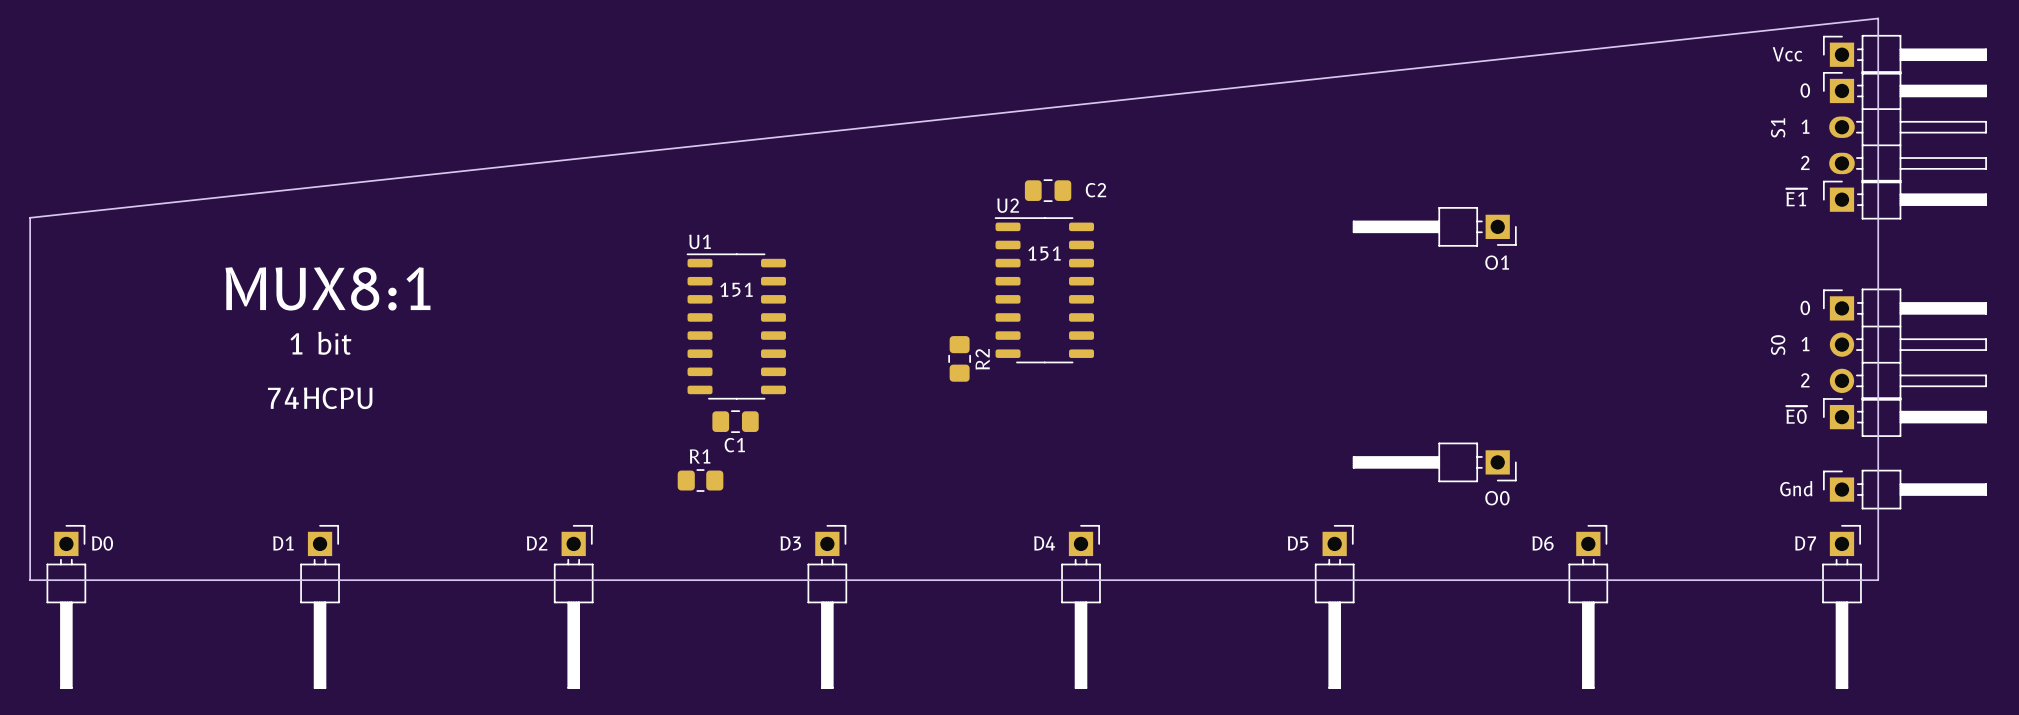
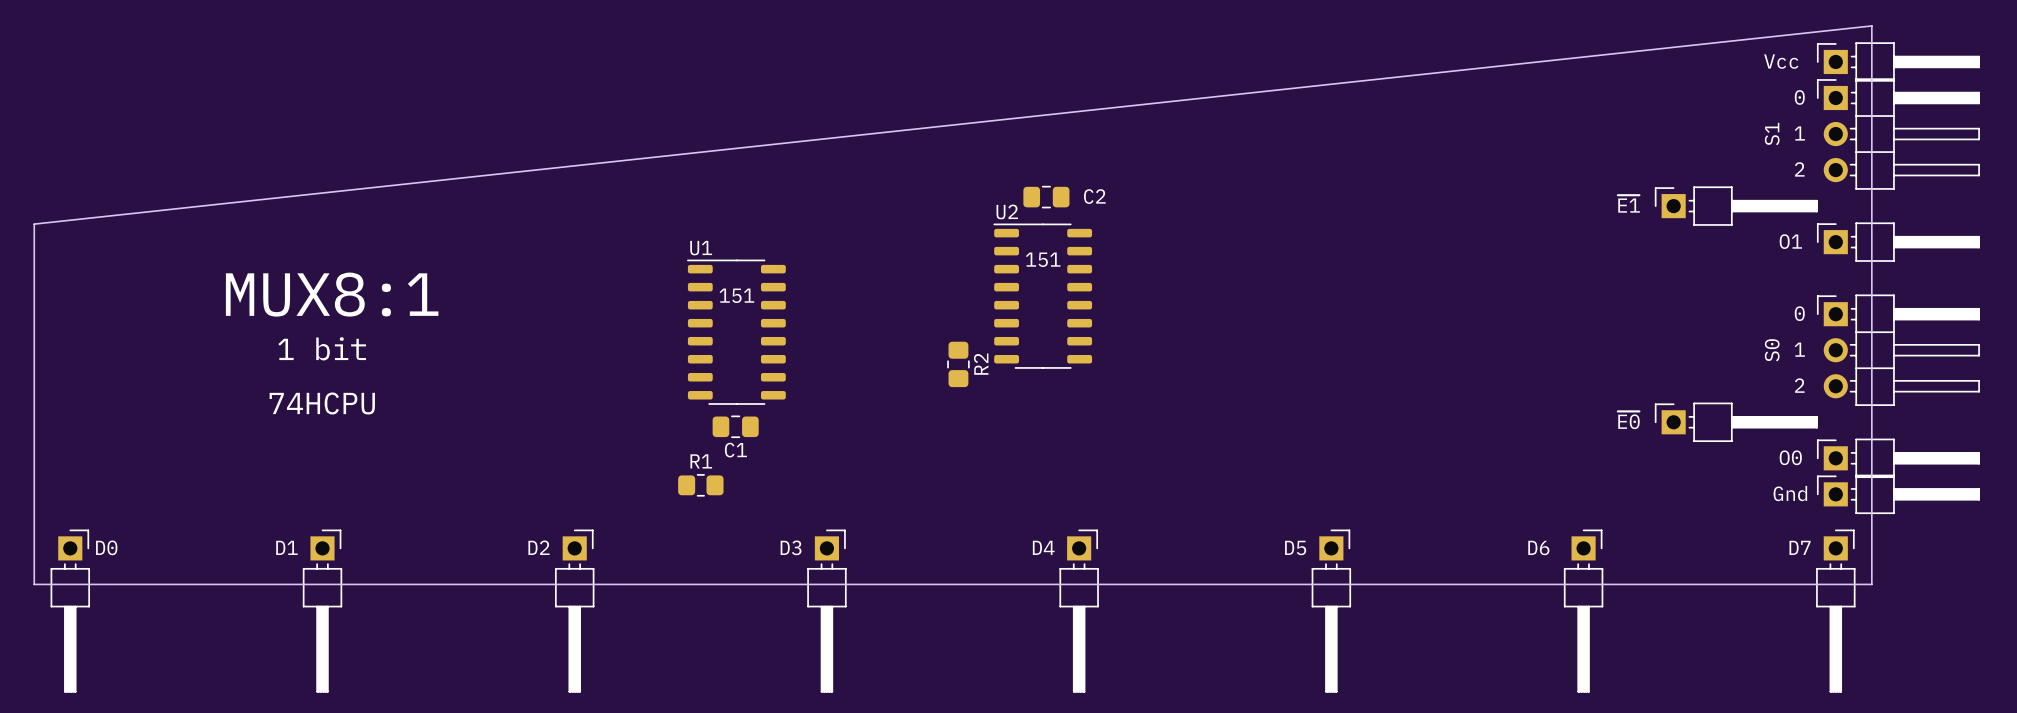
part footprint: [1823, 71, 1987, 184] -> [1816, 78, 1980, 190]
text position: ~{E1} (1796, 197) -> ~{E1} (1628, 203)
part: none -> (1736, 206)
part position: (1904, 199) -> (1898, 242)
part: (1434, 226) -> none
text position: O1 (1497, 262) -> O1 (1790, 241)
text position: ~{E0} (1796, 415) -> ~{E0} (1628, 420)
part: none -> (1736, 422)
part position: (1904, 417) -> (1898, 458)
part: (1434, 462) -> none
text position: O0 (1497, 498) -> O0 (1790, 457)

